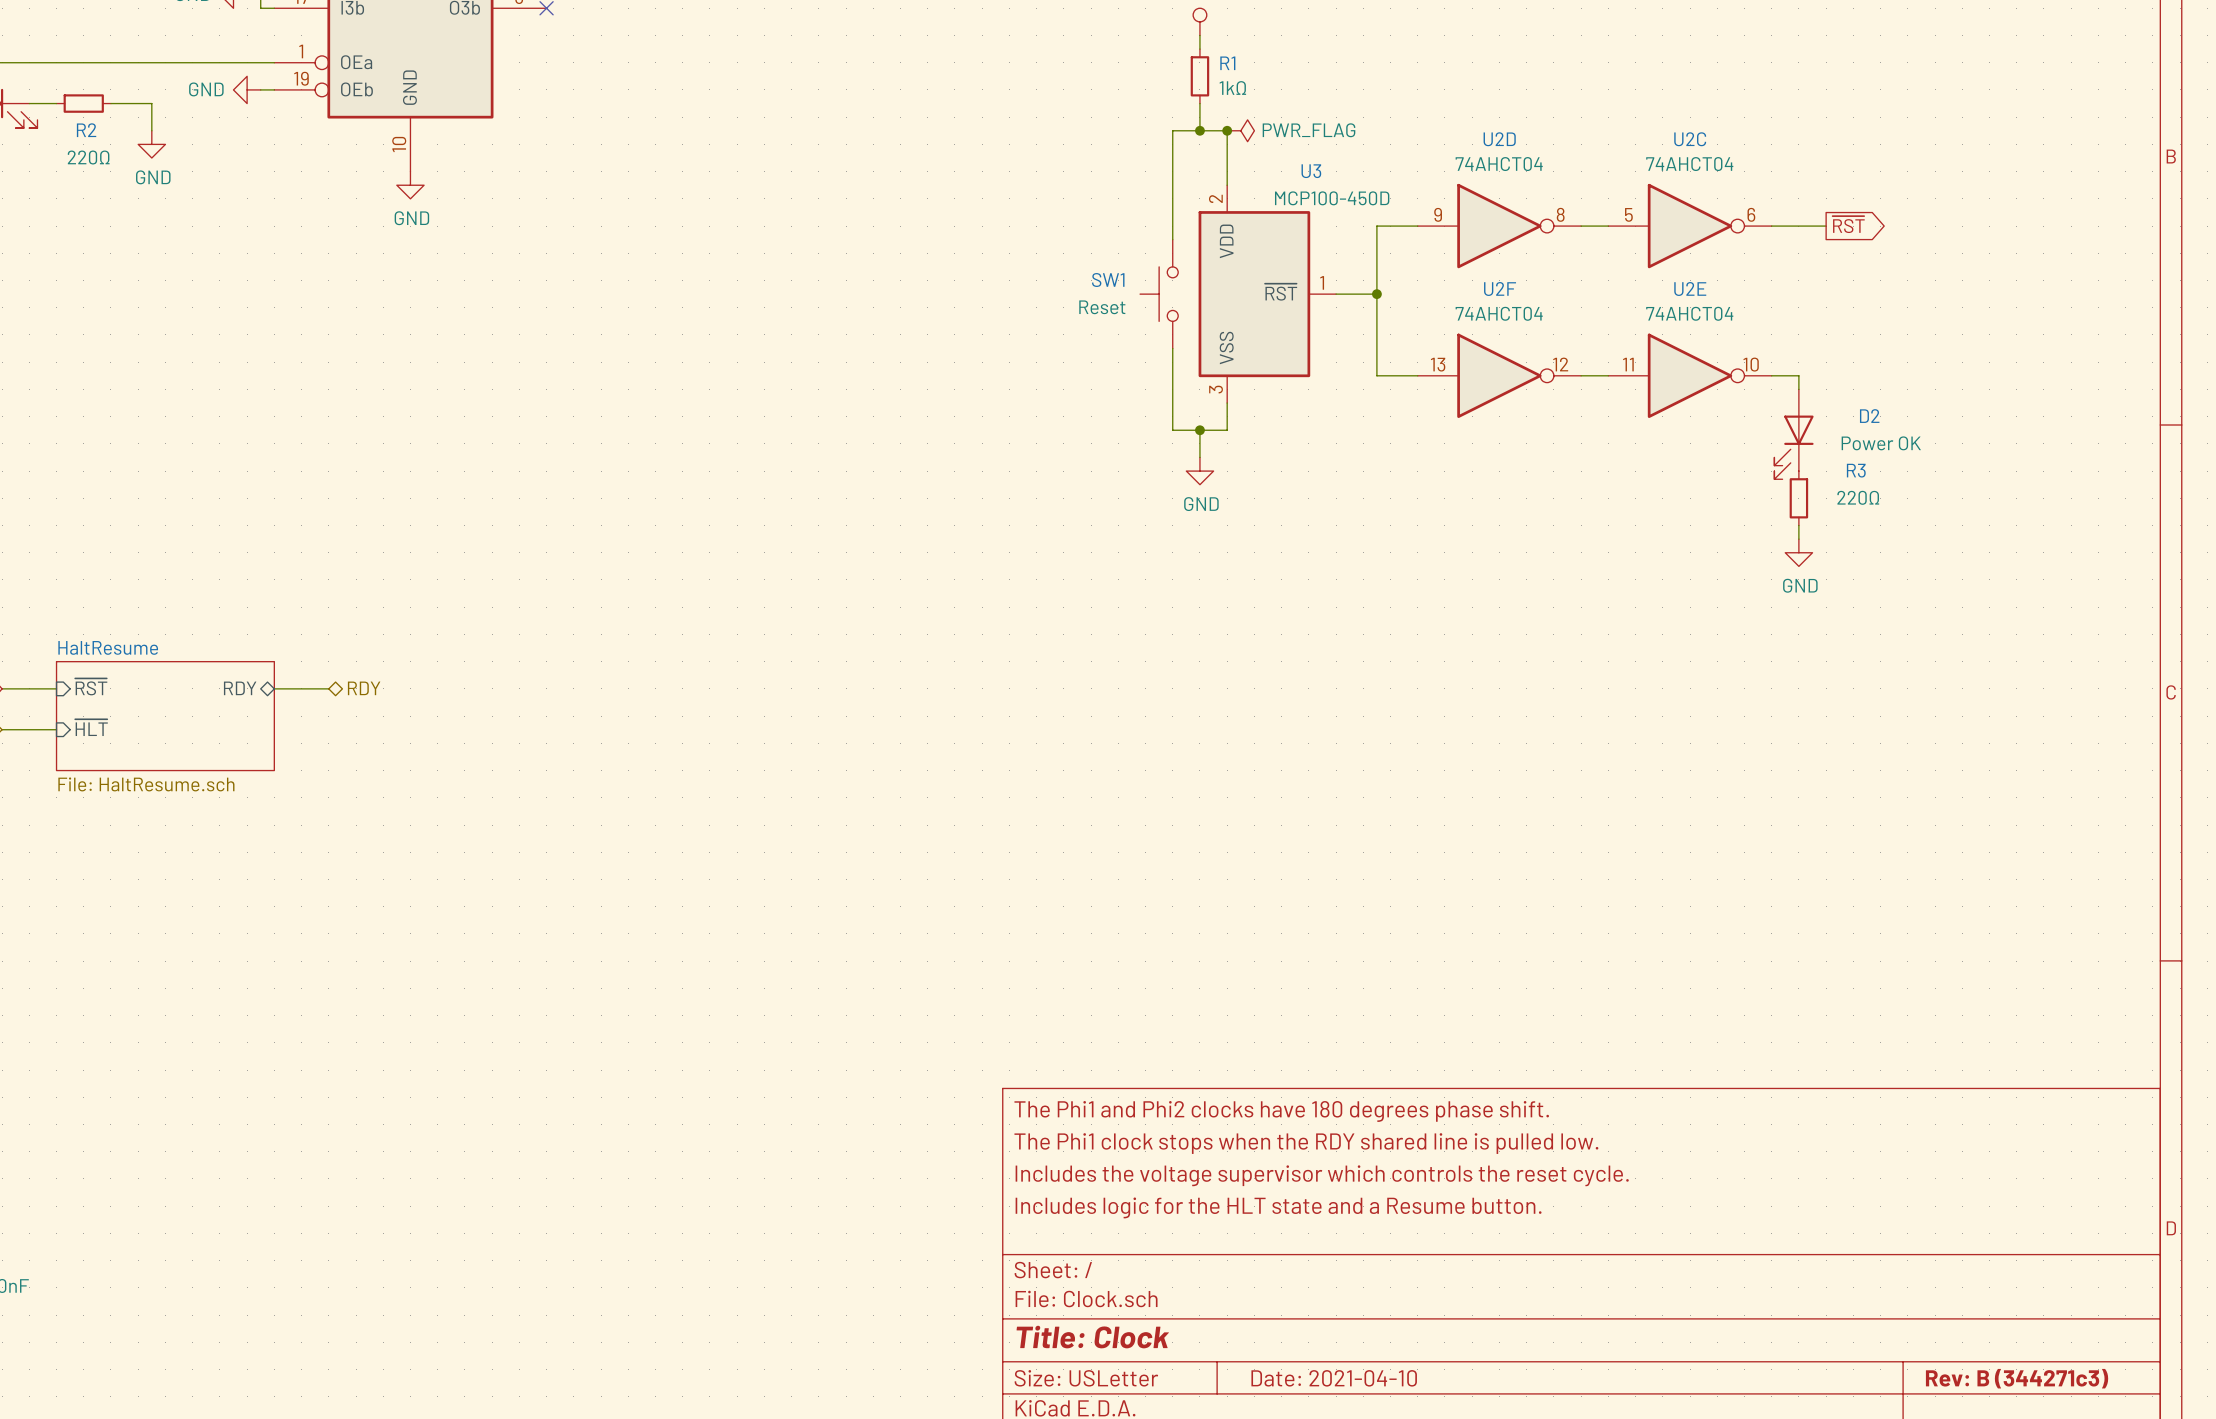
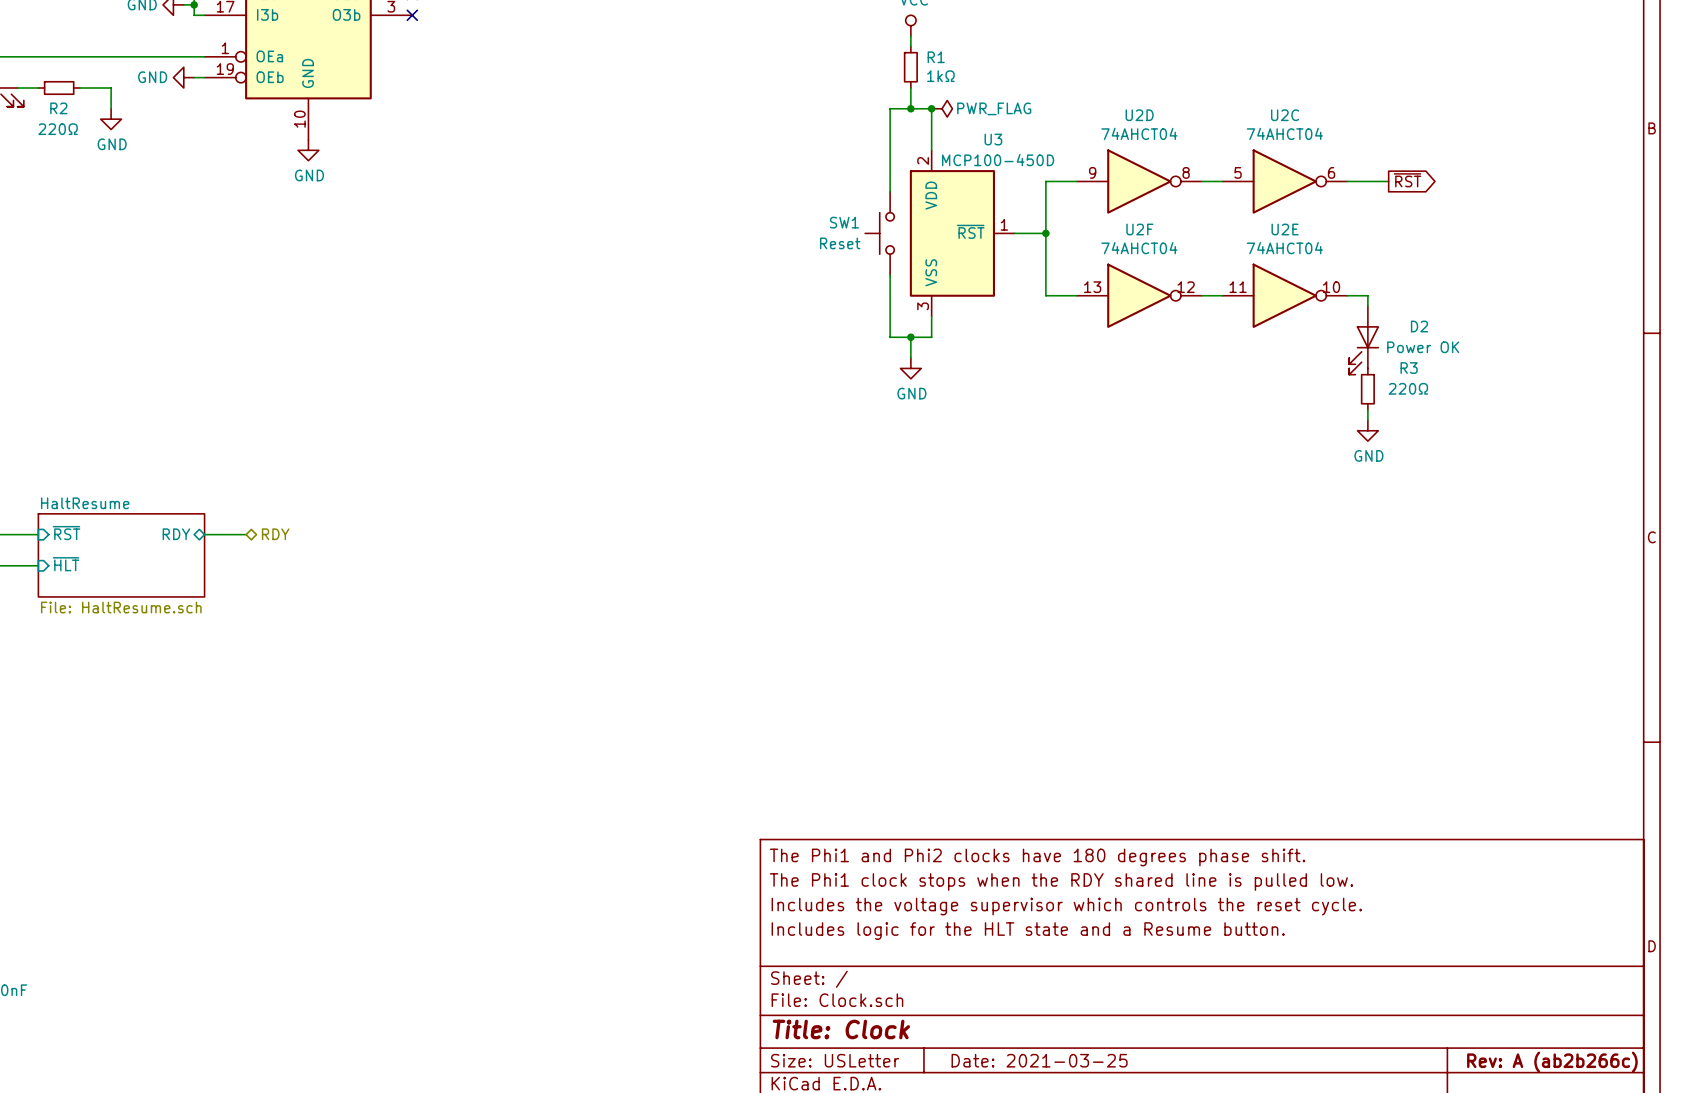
title block: Date: 2021-04-10 (1334, 1378) -> Date: 2021-03-25 (1039, 1060)
title block: Rev: B (344271c3) (2017, 1378) -> Rev: A (ab2b266c) (1552, 1062)

